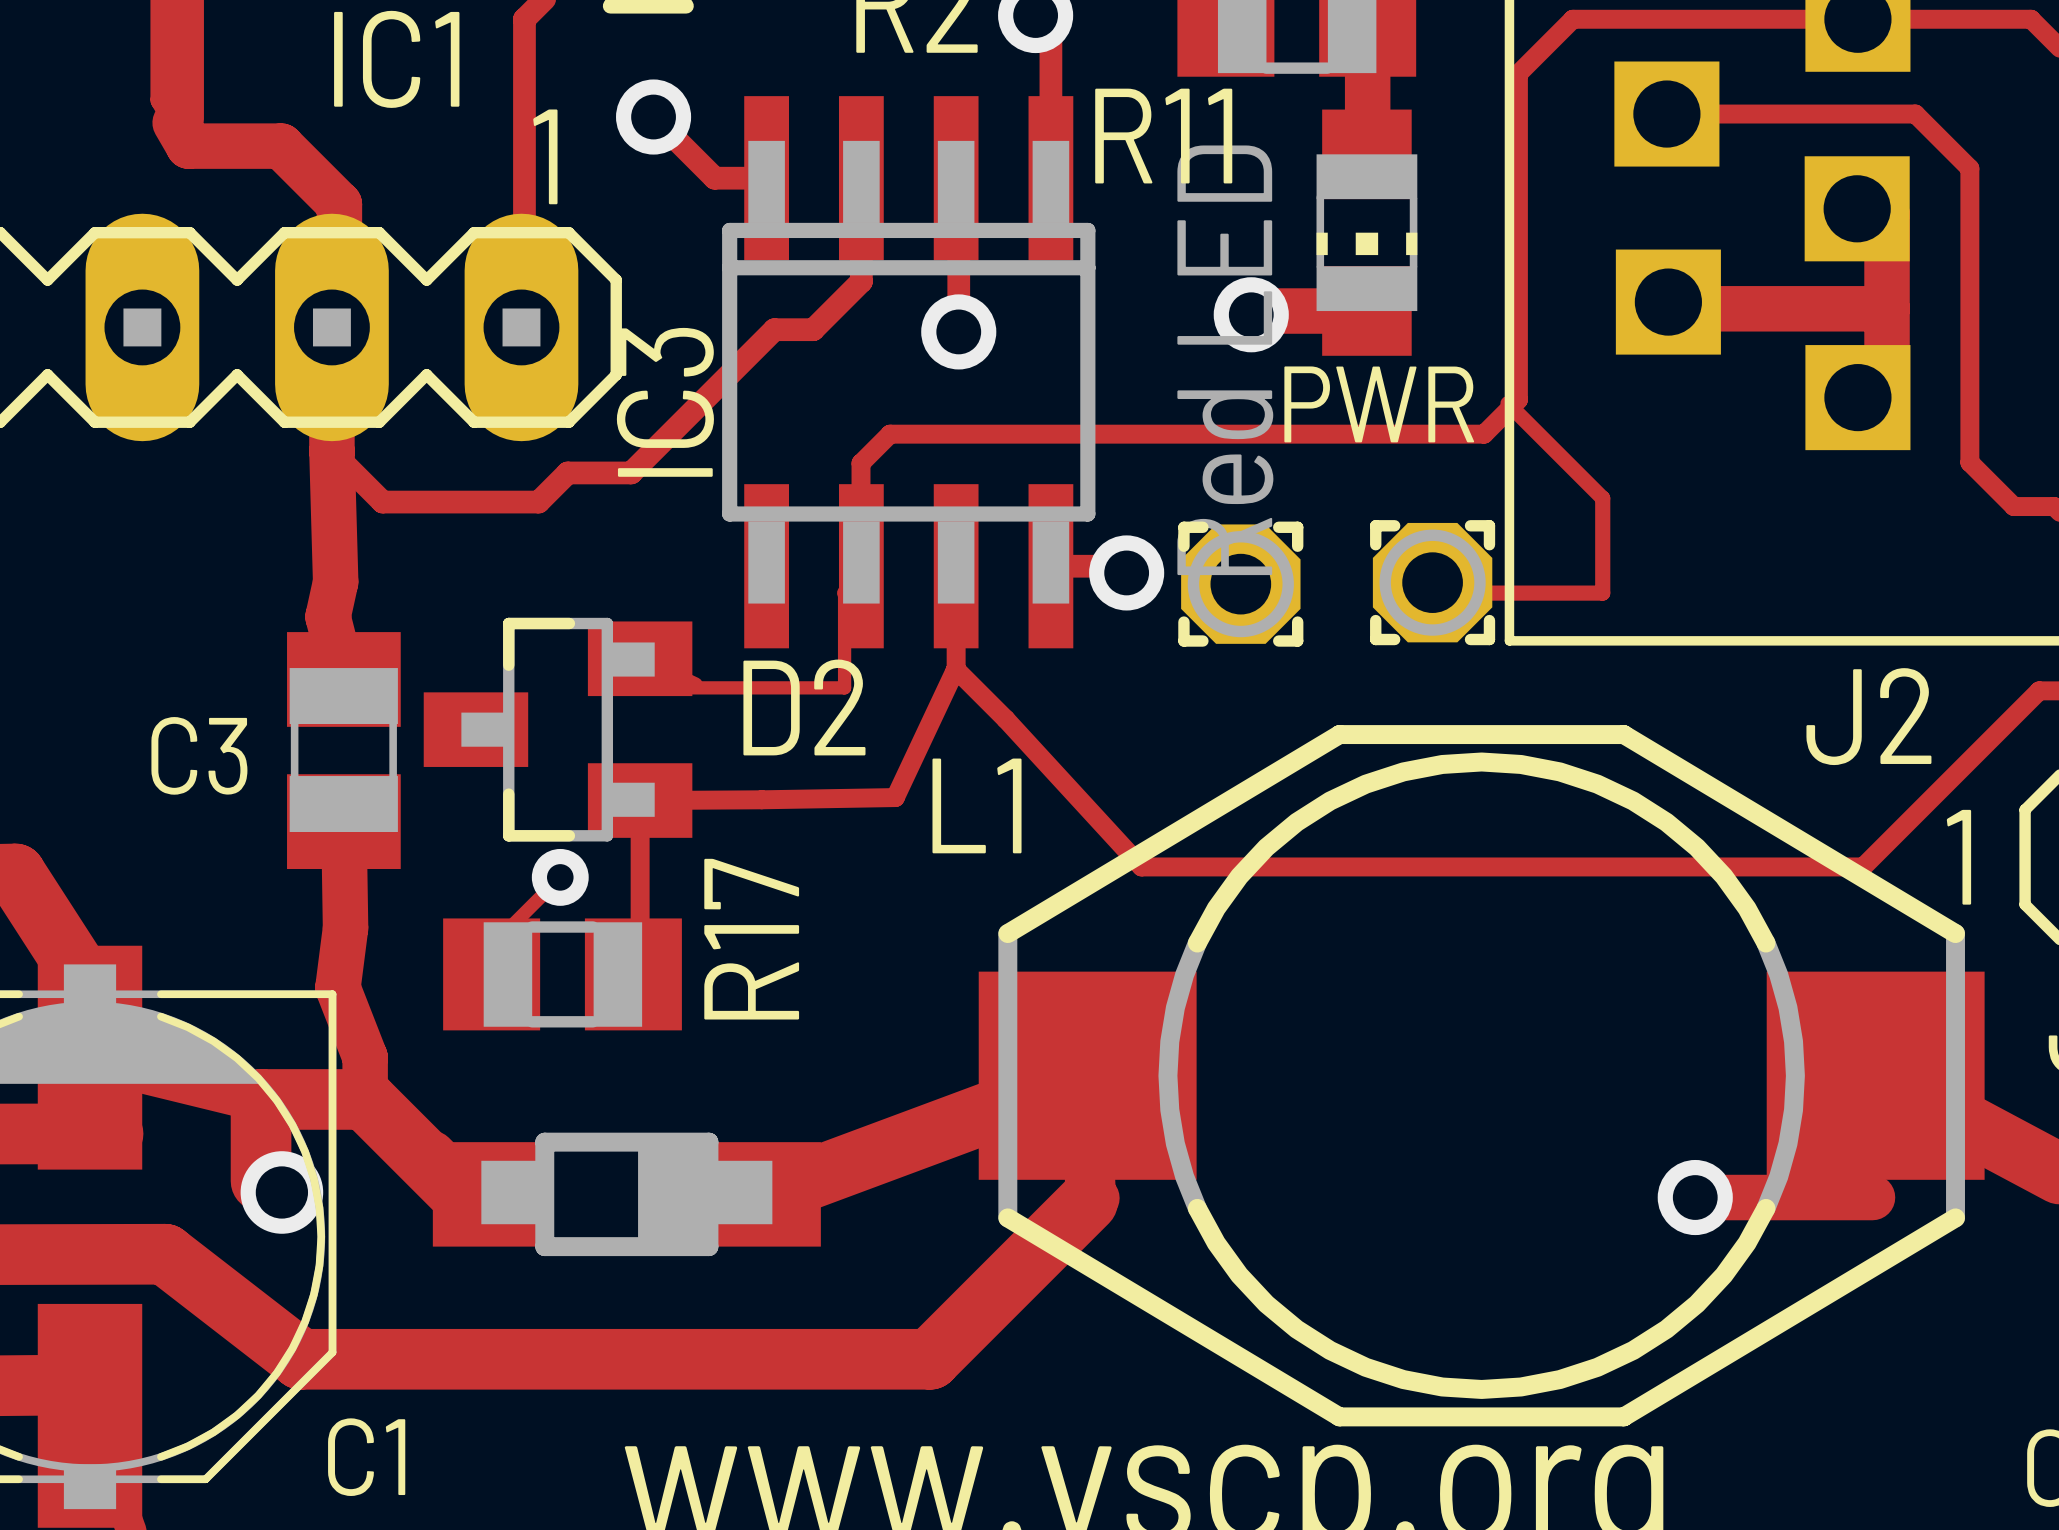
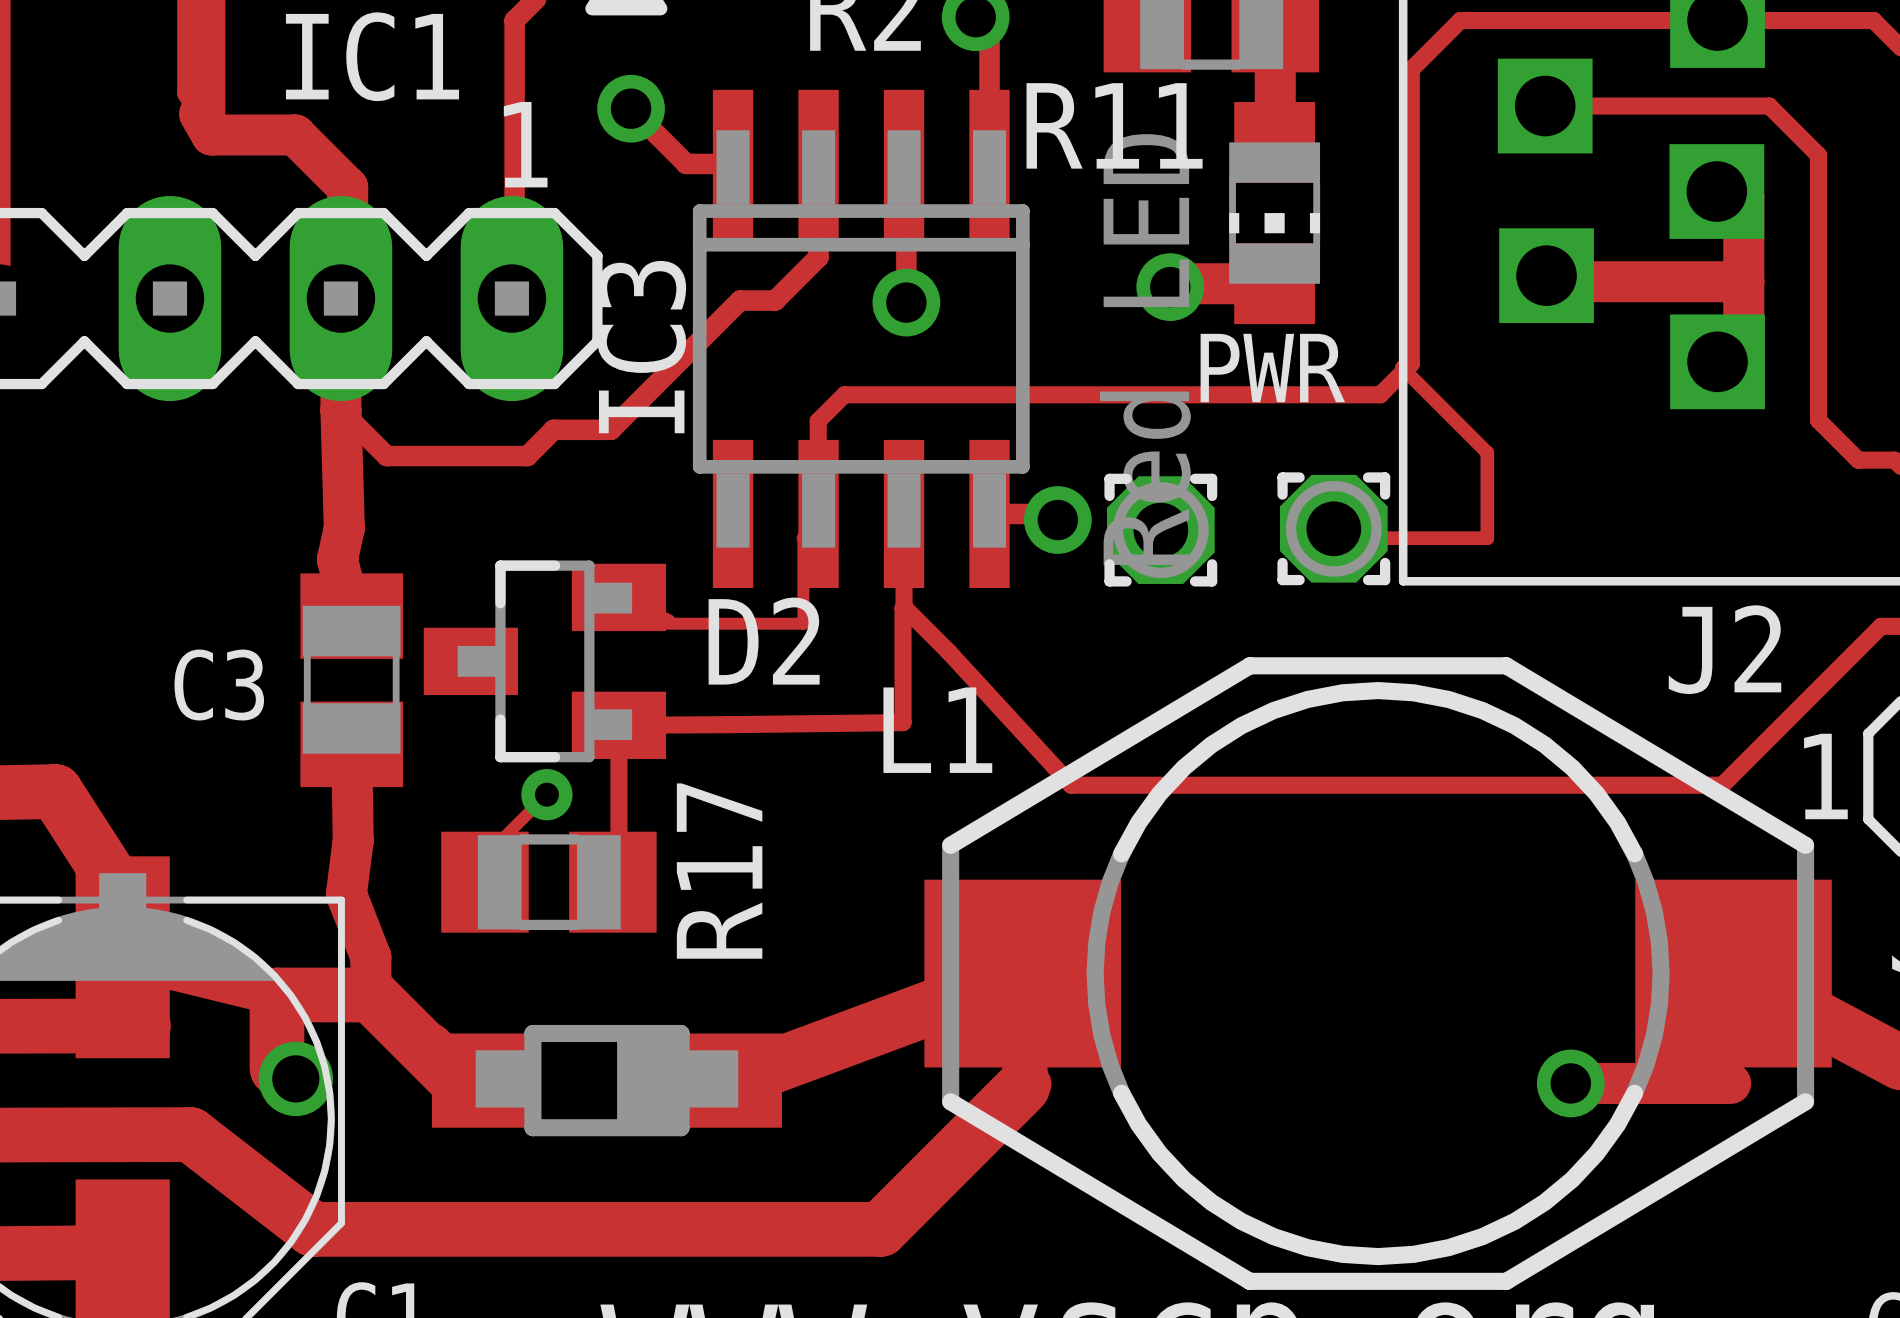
track: (955, 670) (895, 797) (761, 799) -> (903, 608) (903, 722) (728, 724)

